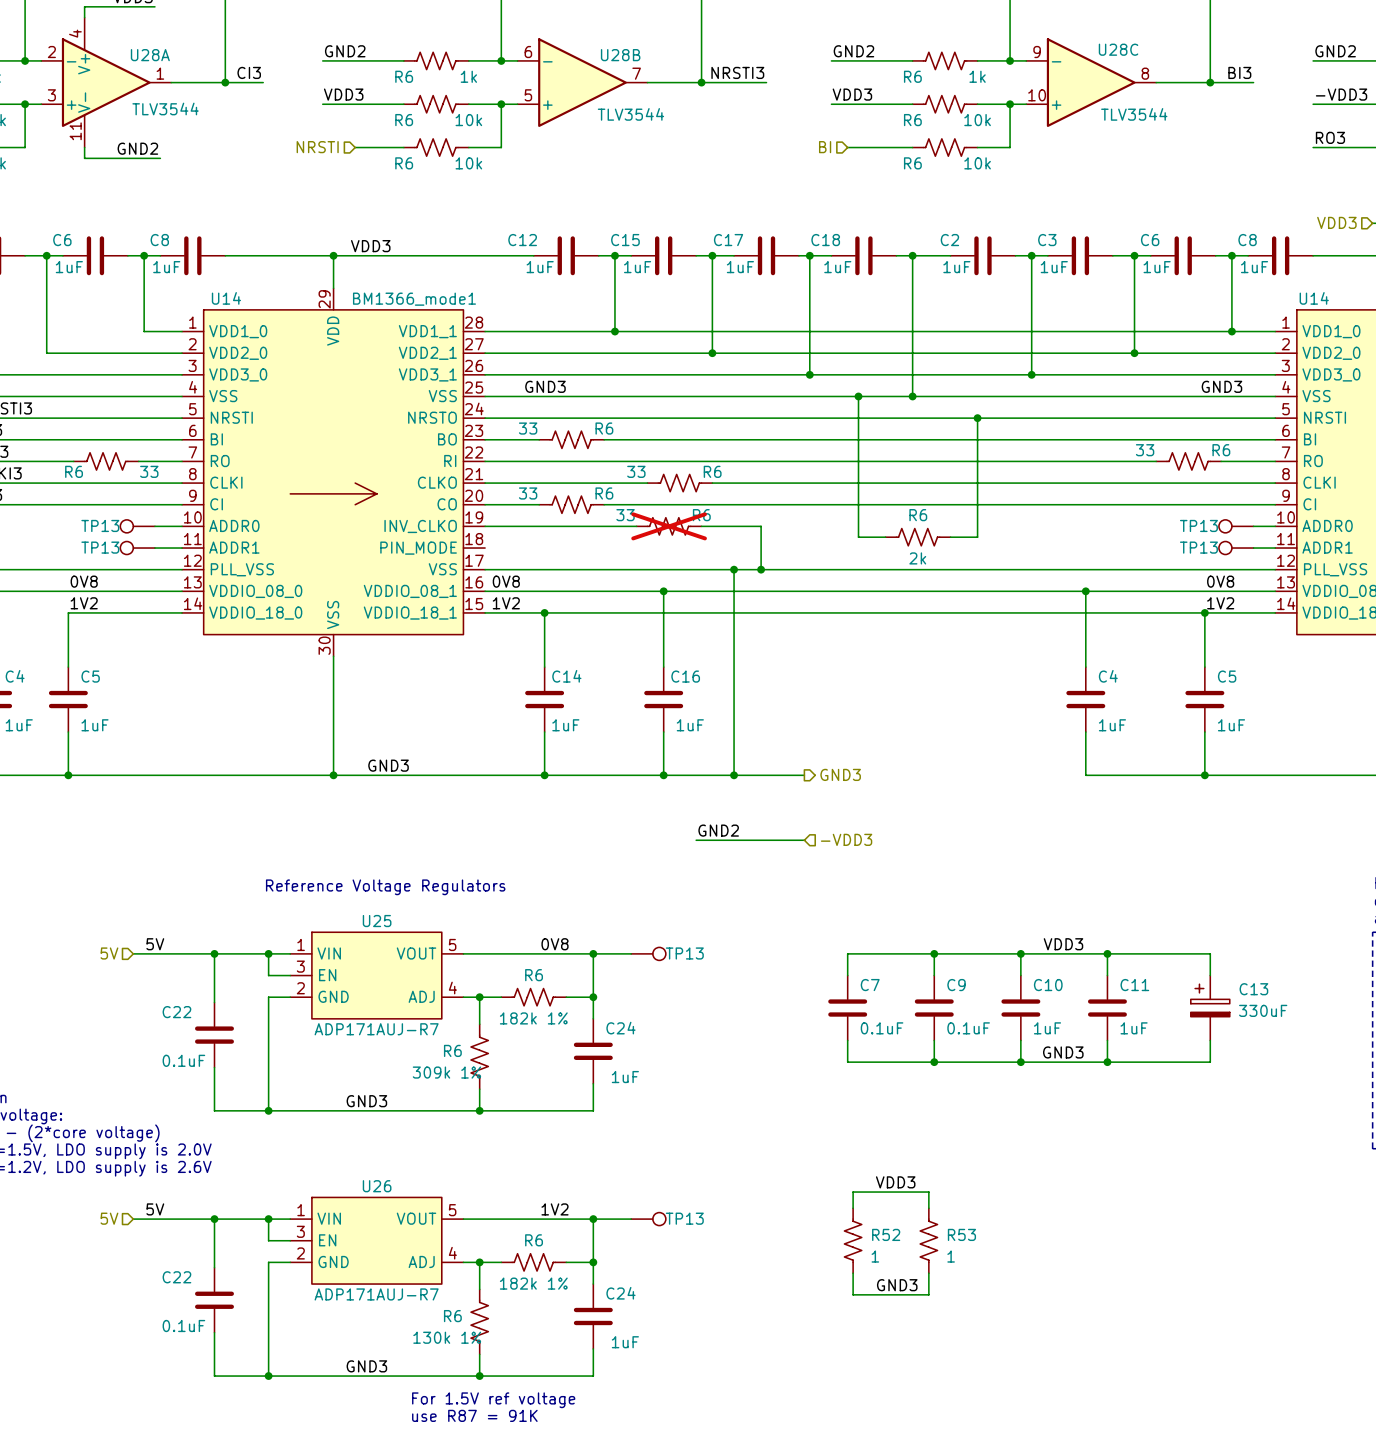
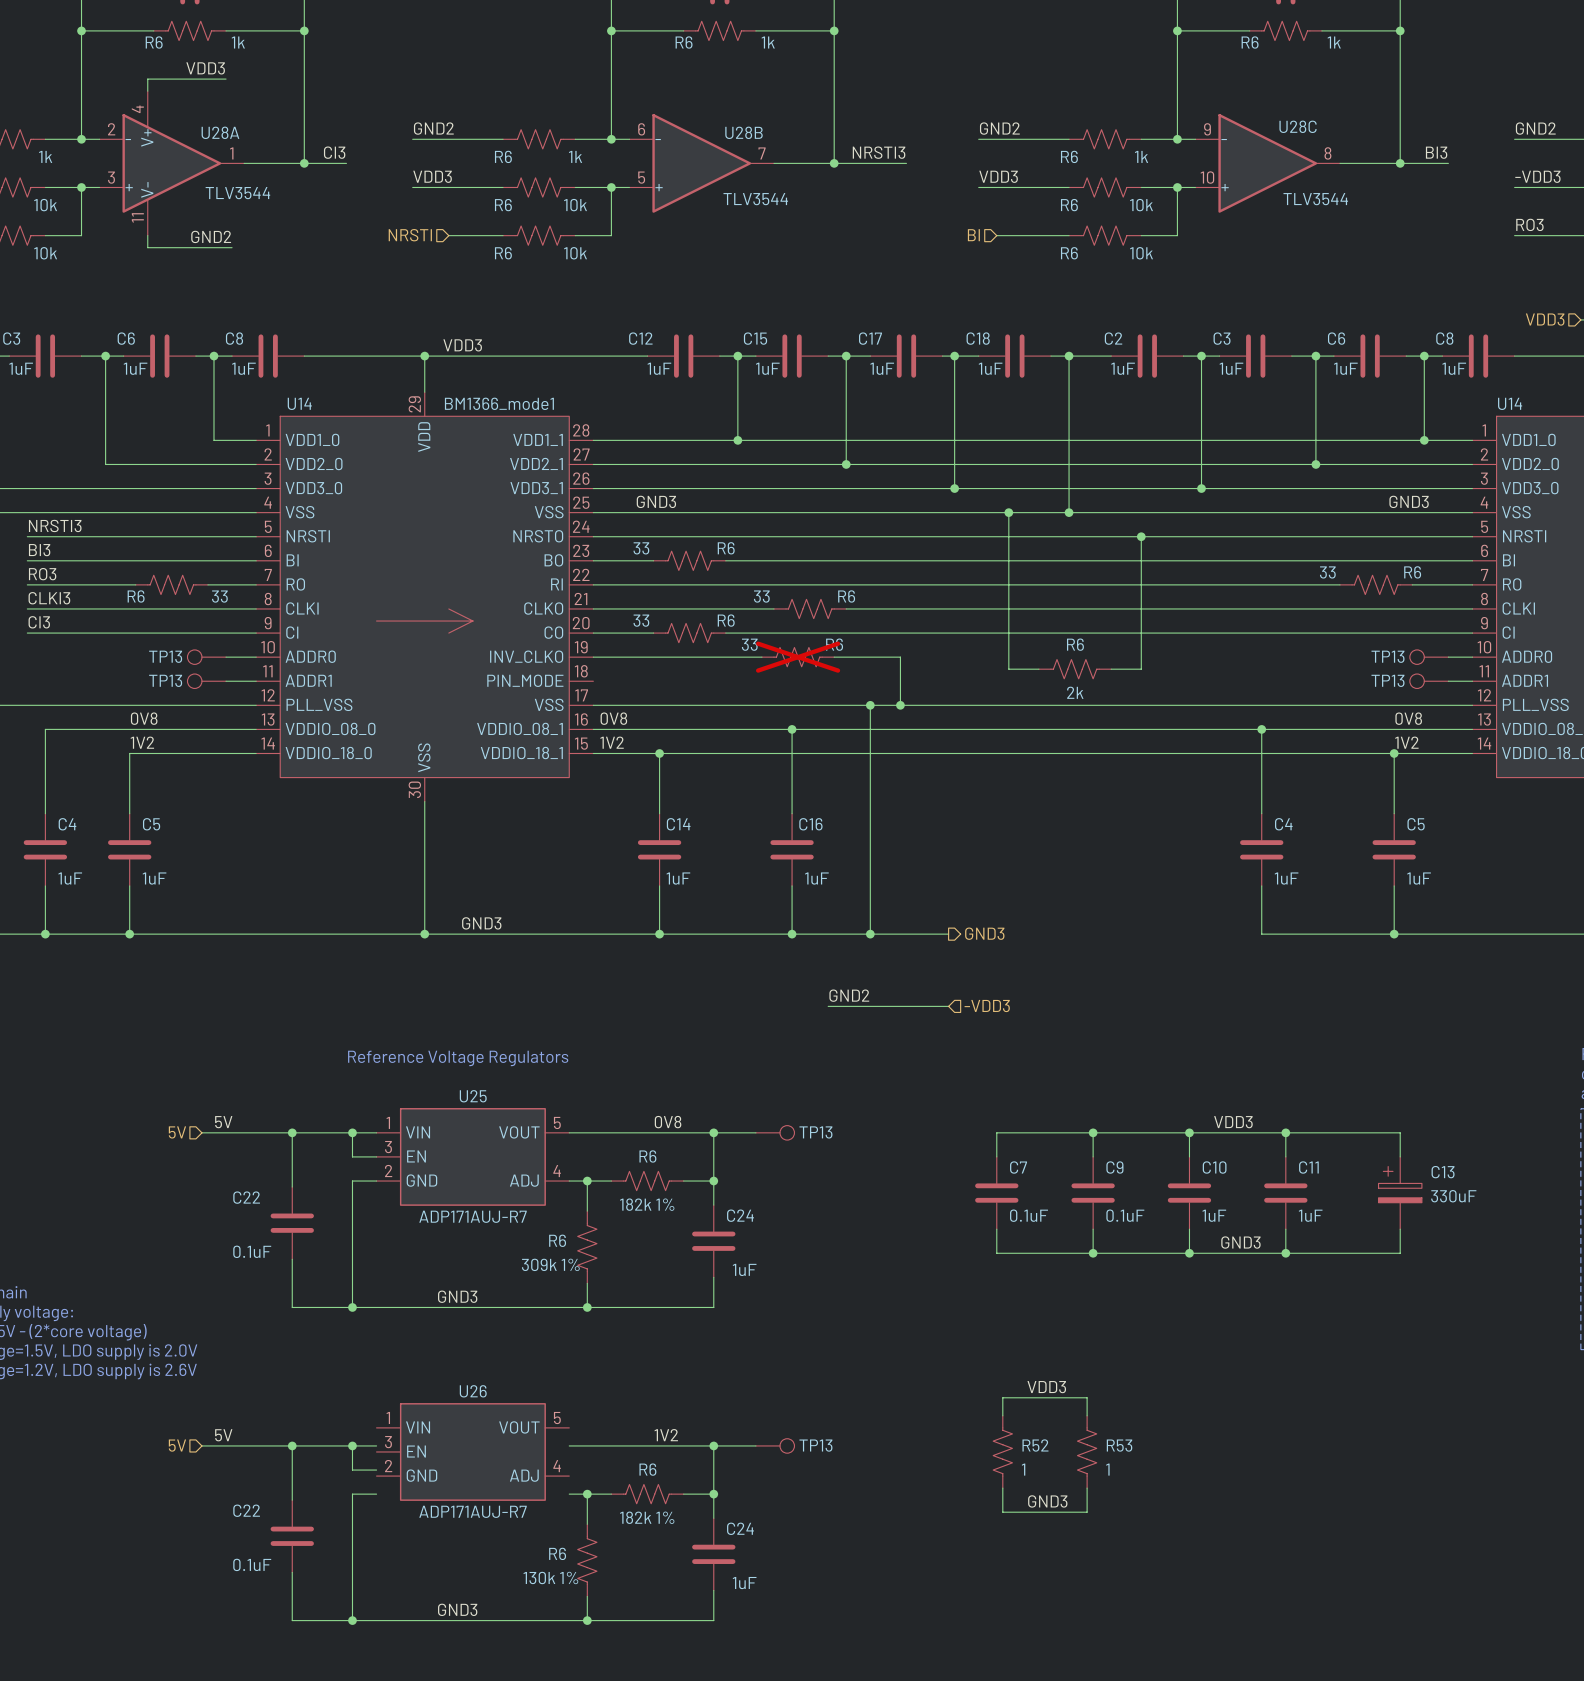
label position: 5V (155, 1209) -> 5V (223, 1435)
label position: 1V2 (555, 1209) -> 1V2 (666, 1435)
hierarchical label position: 5V (109, 1218) -> 5V (177, 1445)
wire: (133, 1219) (290, 1219) -> (201, 1445) (376, 1445)
wire: (214, 1219) (214, 1235) -> none
junction position: (214, 1219) -> (292, 1445)
wire: (268, 1219) (268, 1235) -> (352, 1602) (352, 1620)
junction position: (268, 1219) -> (352, 1445)
wire: (463, 1219) (631, 1219) -> (569, 1445) (755, 1445)
wire: (593, 1219) (593, 1235) -> none
junction: (593, 1219) -> none
TP13 position: (648, 1219) -> (775, 1445)
junction: none -> (713, 1445)
wire: (268, 1240) (290, 1240) -> (352, 1451) (352, 1470) (376, 1470)
wire: (290, 1262) (268, 1262) (268, 1278) -> (376, 1494) (352, 1494)
wire: (463, 1262) (501, 1262) -> (569, 1494) (611, 1494)
wire: (479, 1262) (479, 1278) -> (587, 1602) (587, 1620)
junction position: (479, 1262) -> (587, 1494)
R6 position: (533, 1262) -> (647, 1494)
wire: (566, 1262) (593, 1262) -> (683, 1494) (713, 1494)
junction: (593, 1262) -> none
junction: none -> (713, 1494)
C22 position: (214, 1300) -> (292, 1536)
C24 position: (593, 1316) -> (713, 1554)
R6 position: (479, 1321) -> (587, 1560)
label position: GND3 (366, 1366) -> GND3 (457, 1609)
wire: (214, 1376) (593, 1376) -> (292, 1602) (292, 1620) (713, 1620) (713, 1602)
junction position: (268, 1376) -> (352, 1620)
junction position: (479, 1376) -> (587, 1620)
text: For 1.5V ref voltage (493, 1400) -> none
text: use R87 = 91K (474, 1415) -> none

